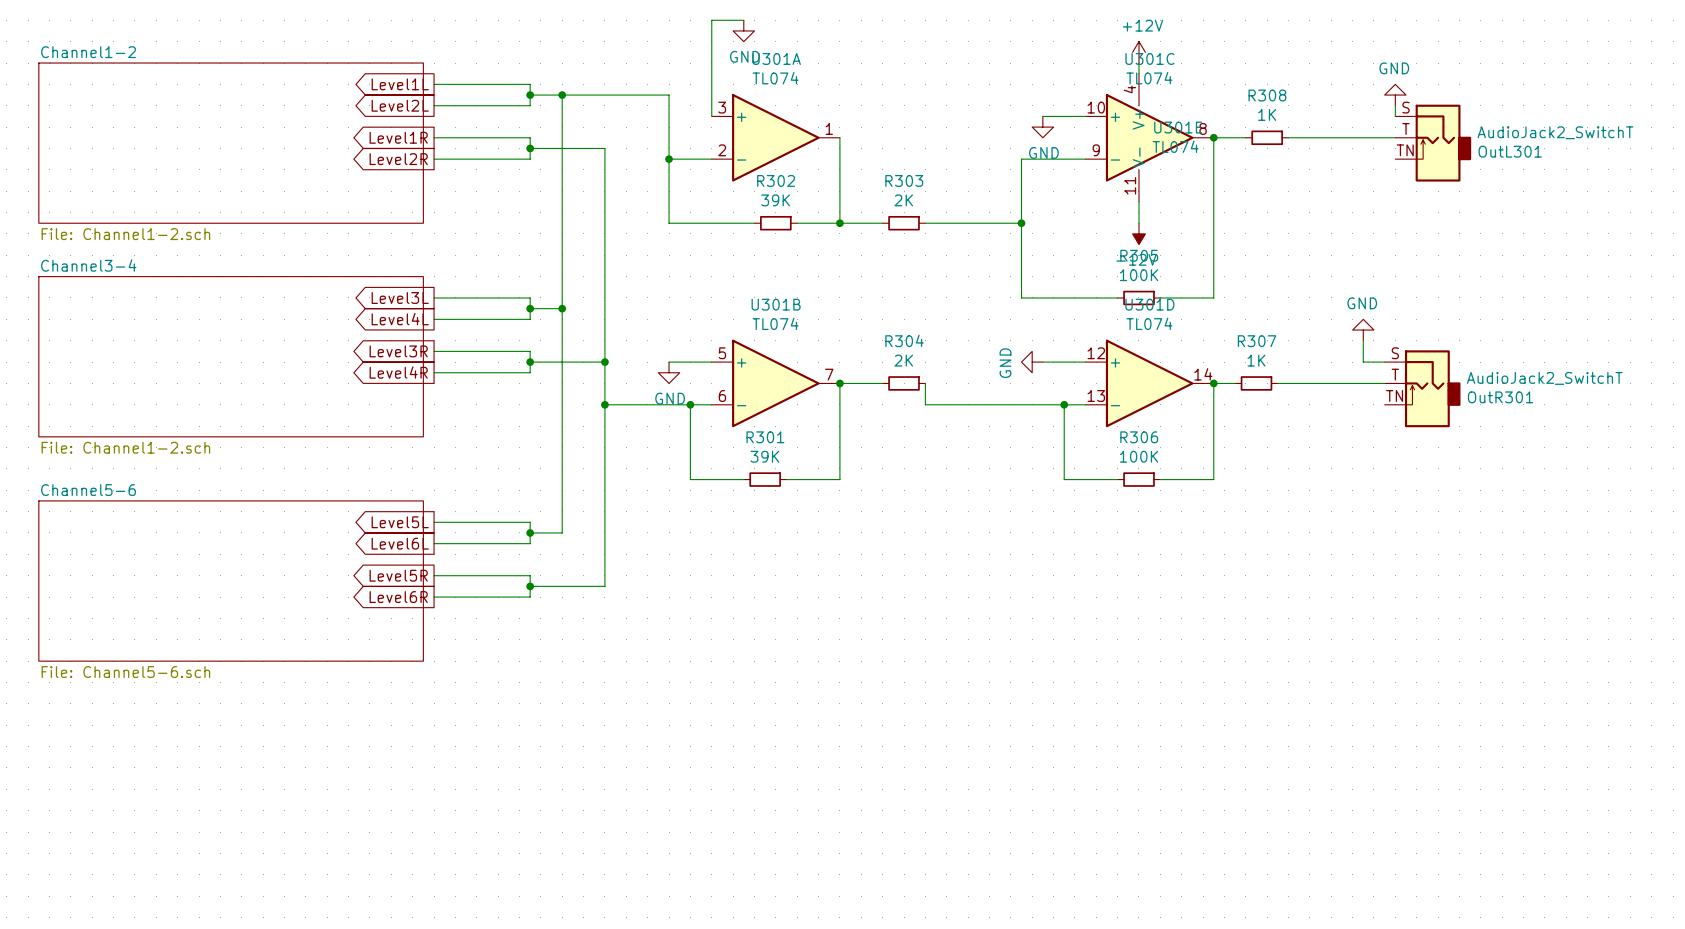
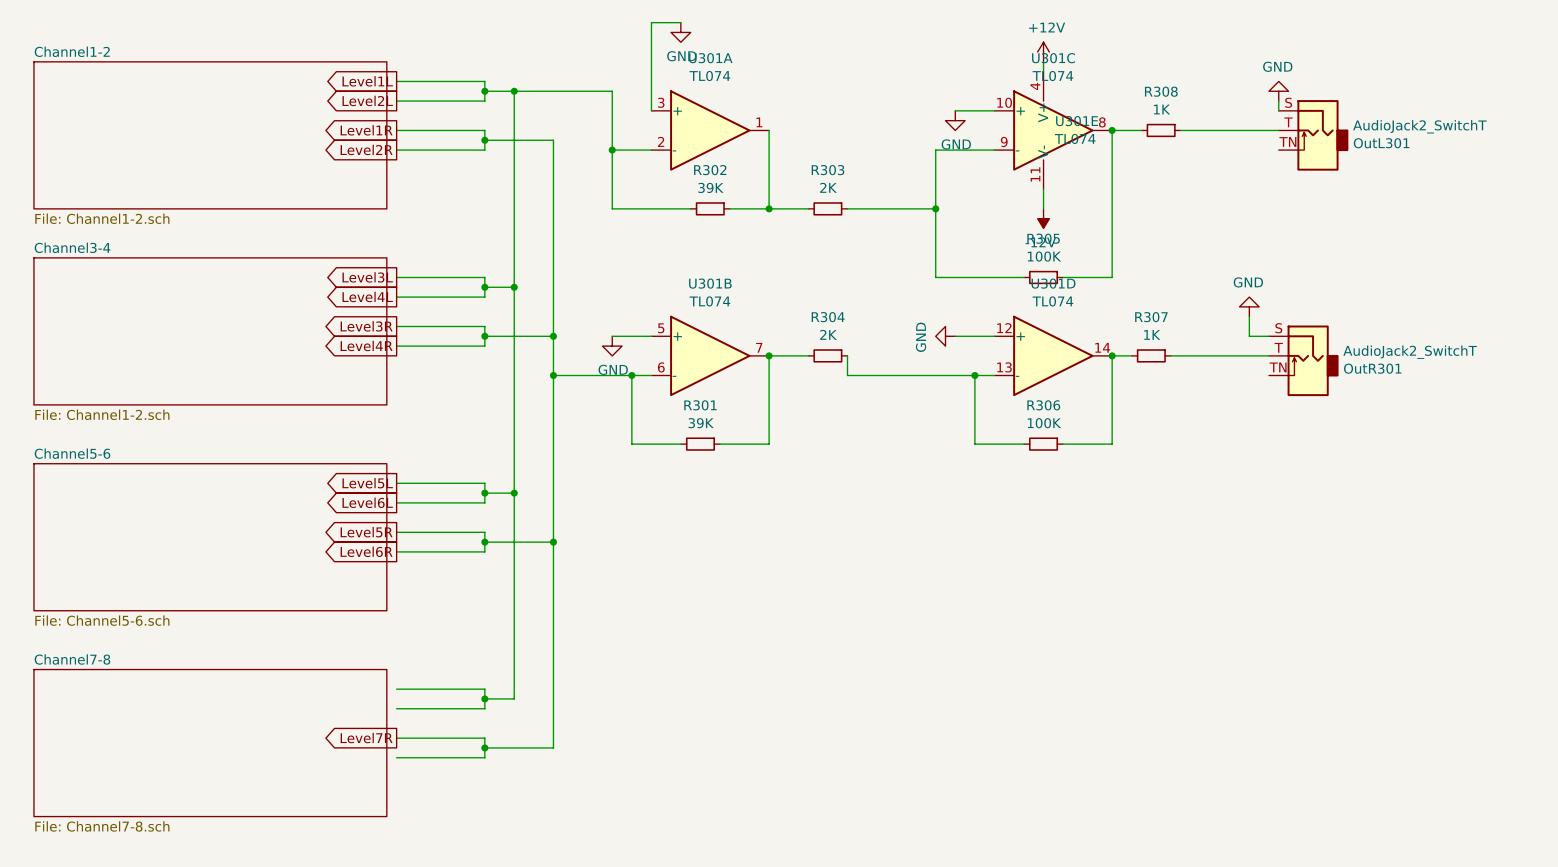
wire: none -> (514, 493) (514, 698) (484, 698)
junction: none -> (514, 493)
wire: none -> (553, 542) (553, 747) (484, 747)
junction: none -> (553, 542)
wire: none -> (396, 689) (484, 689) (484, 708) (396, 708)
junction: none -> (484, 698)
global label: none -> Level7R (366, 738)
wire: none -> (396, 738) (484, 738) (484, 757) (396, 757)
sheet Channel7-8: none -> File: Channel7-8.sch (210, 743)
junction: none -> (484, 747)

